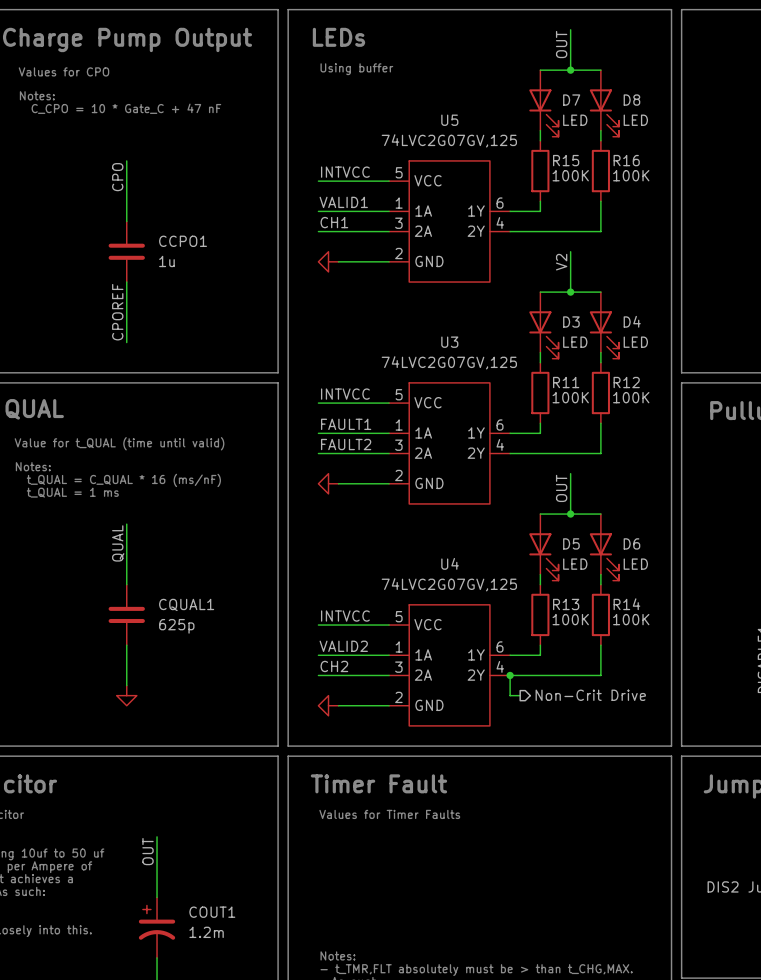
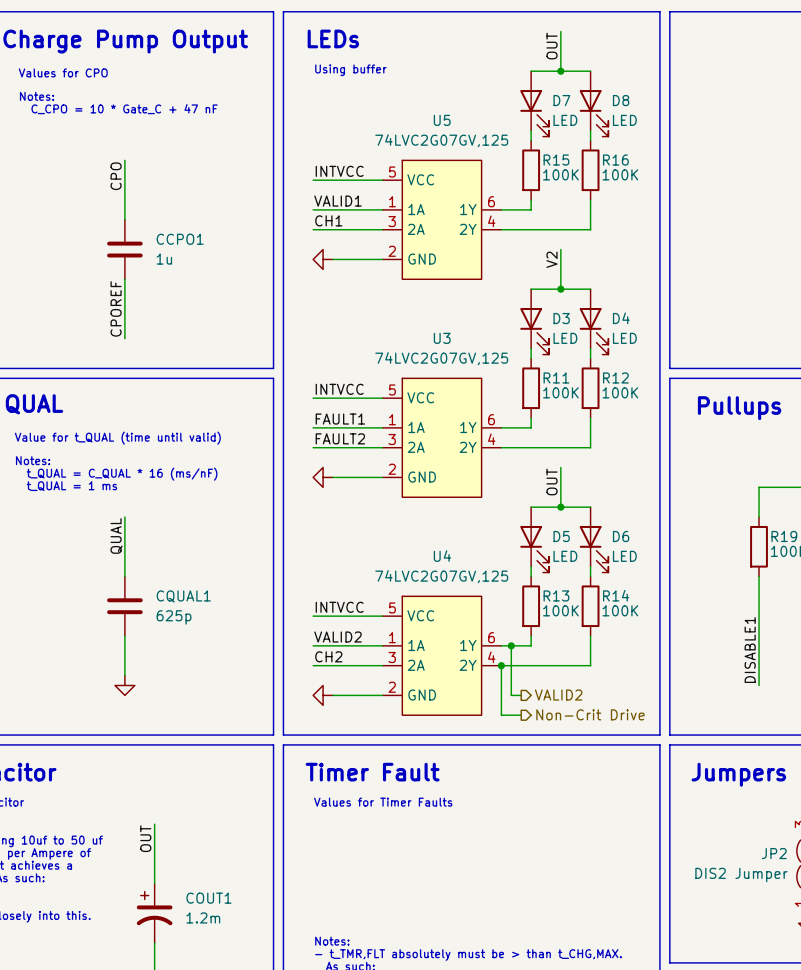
wire: none -> (511, 645) (511, 695) (521, 695)
junction: none -> (511, 645)
wire: (510, 695) (520, 695) -> (501, 685) (501, 715) (521, 715)
hierarchical label position: Non-Crit Drive (590, 695) -> Non-Crit Drive (590, 714)
hierarchical label: none -> VALID2 (558, 695)

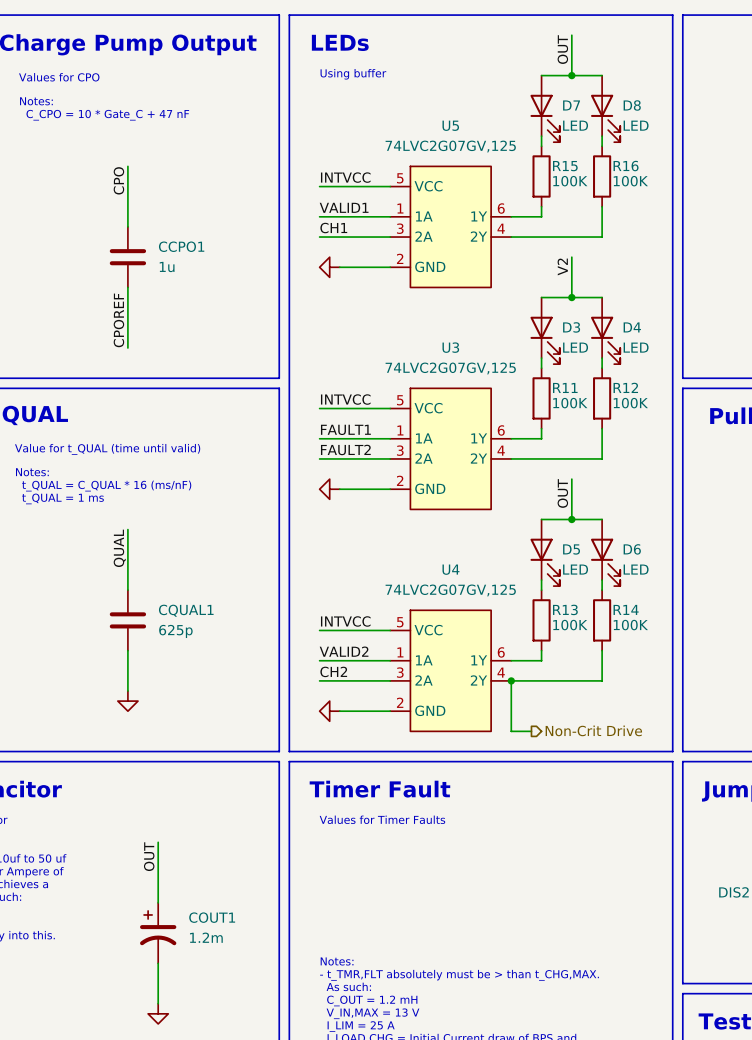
wire: (511, 645) (511, 695) (521, 695) -> none
junction: (511, 645) -> none
hierarchical label: VALID2 (558, 695) -> none

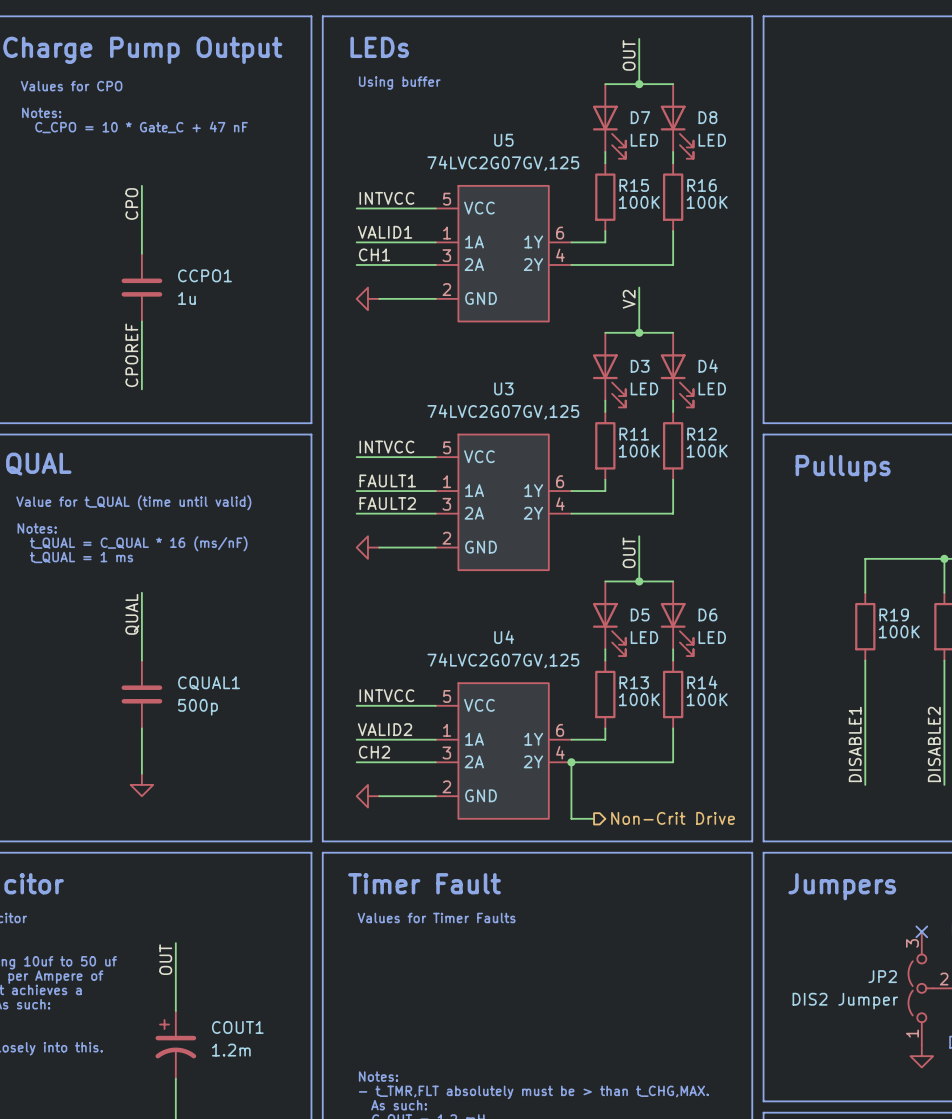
CQUAL1 value: 625p (175, 631) -> 500p (197, 707)

